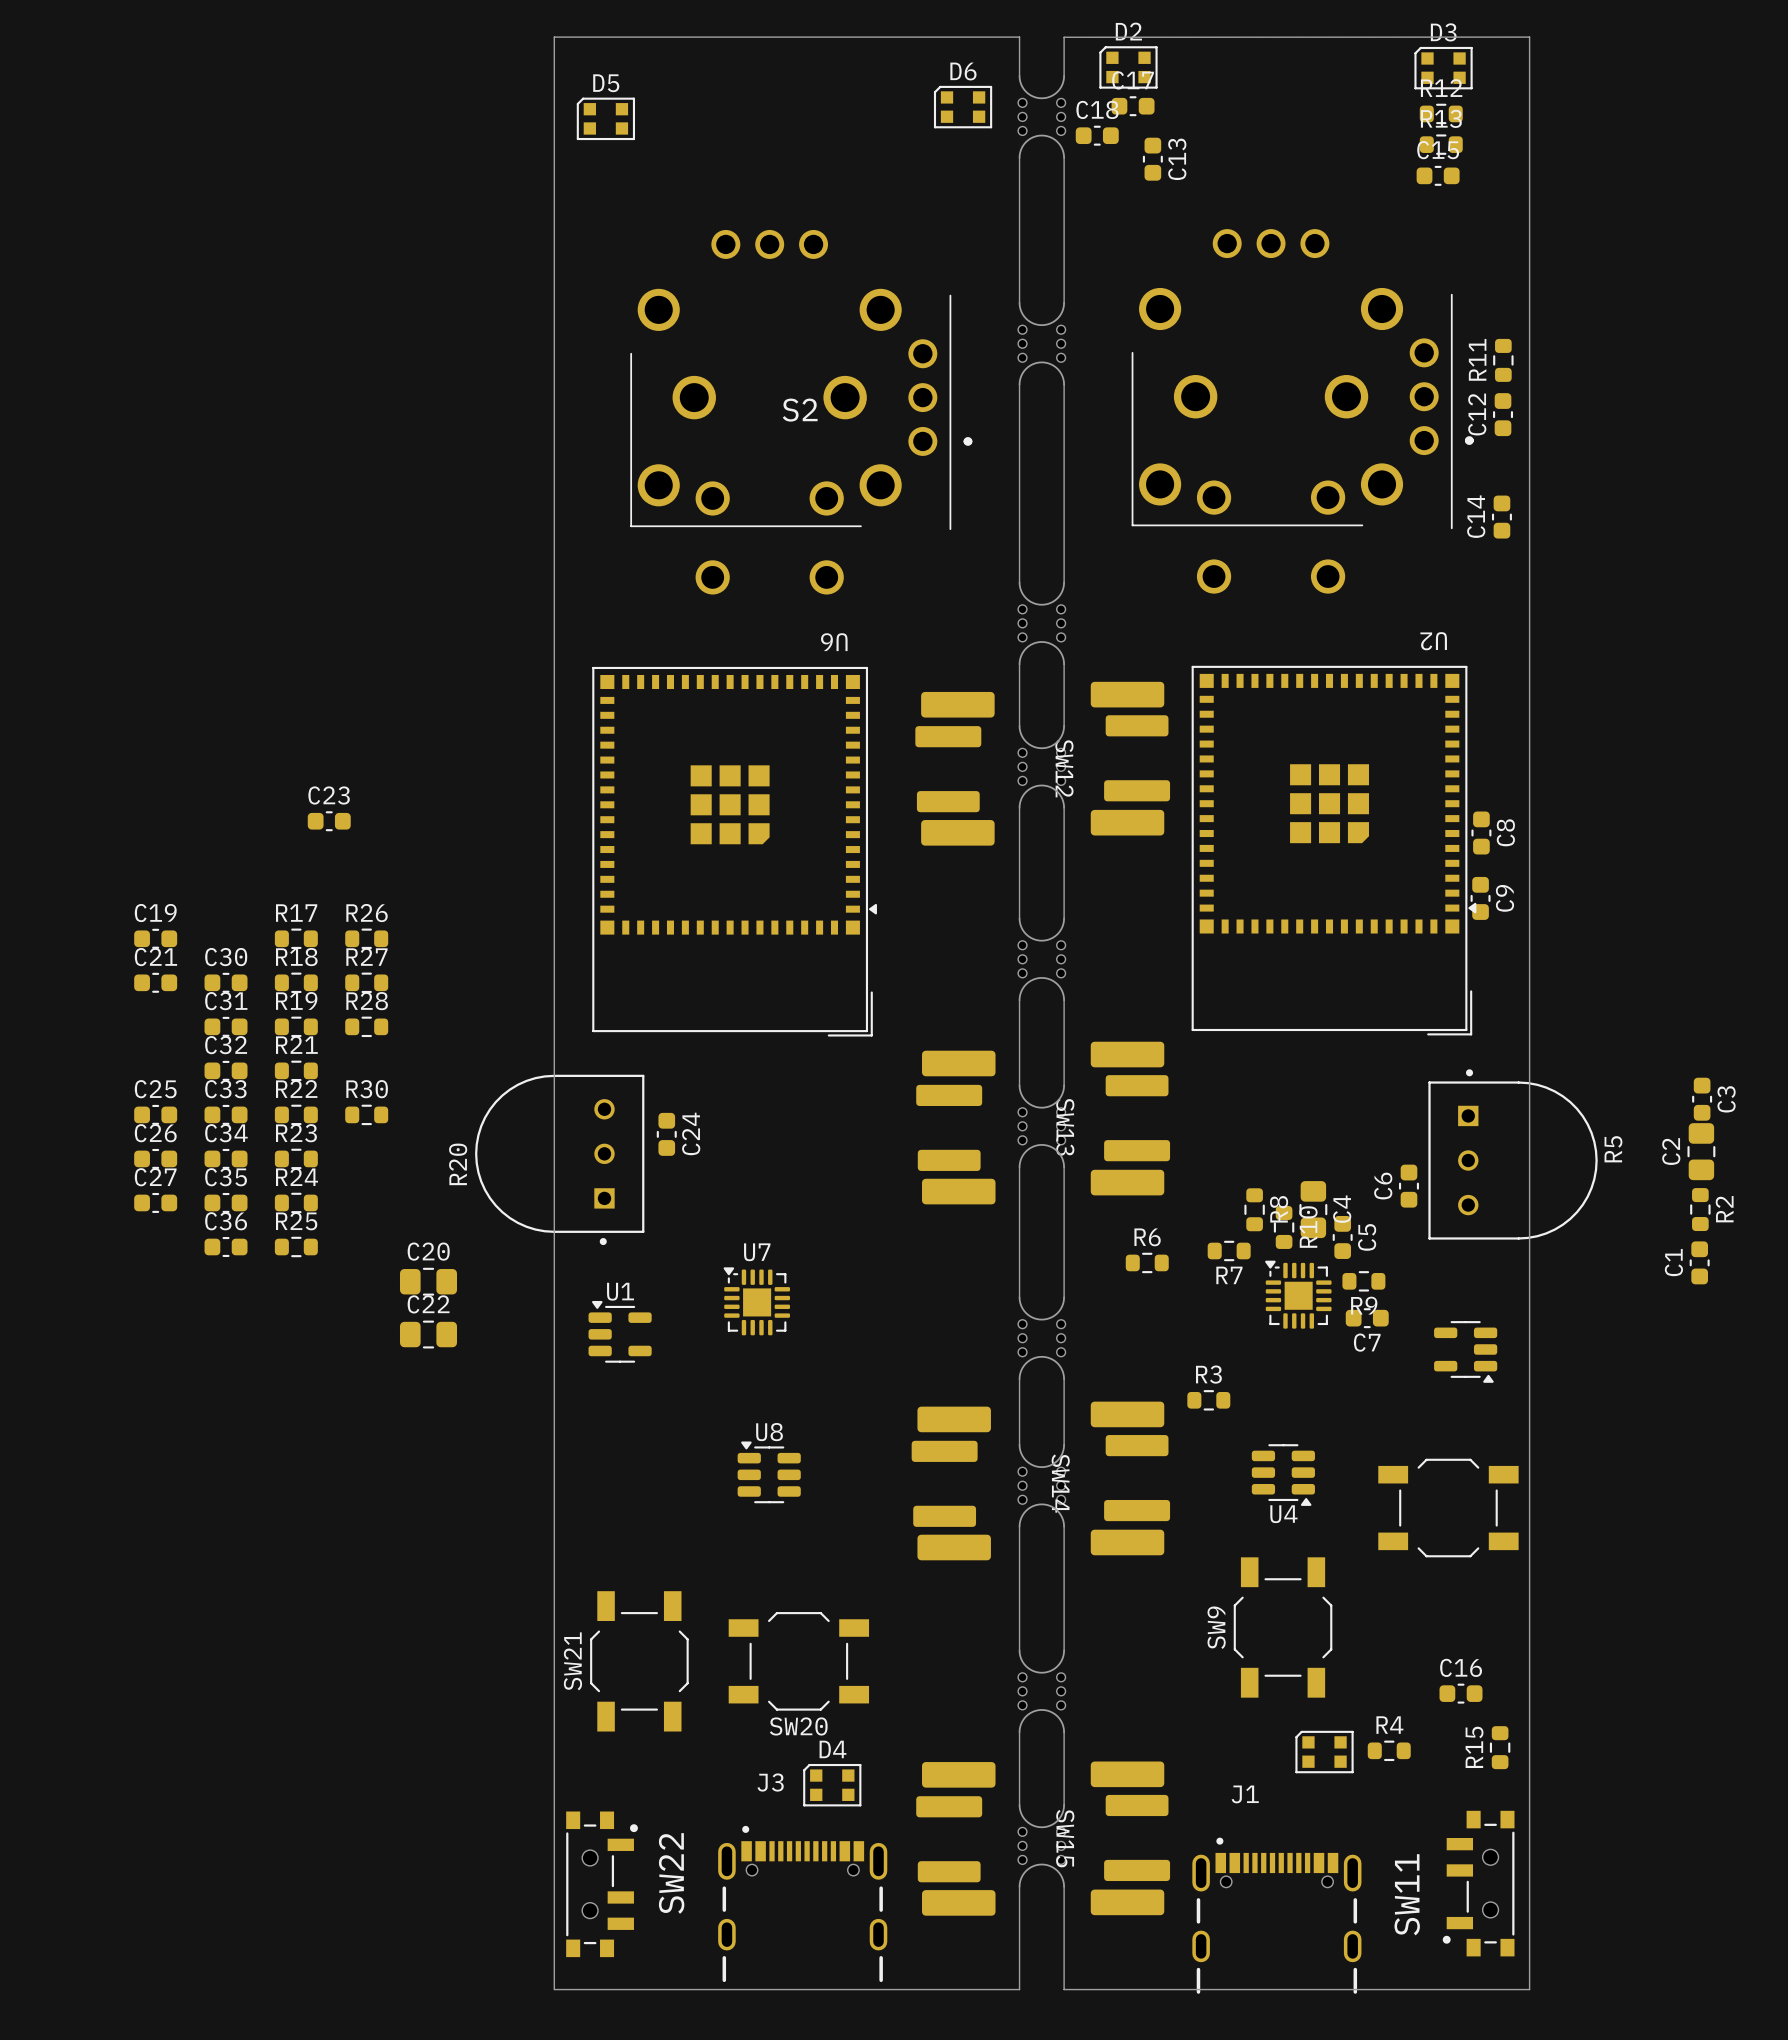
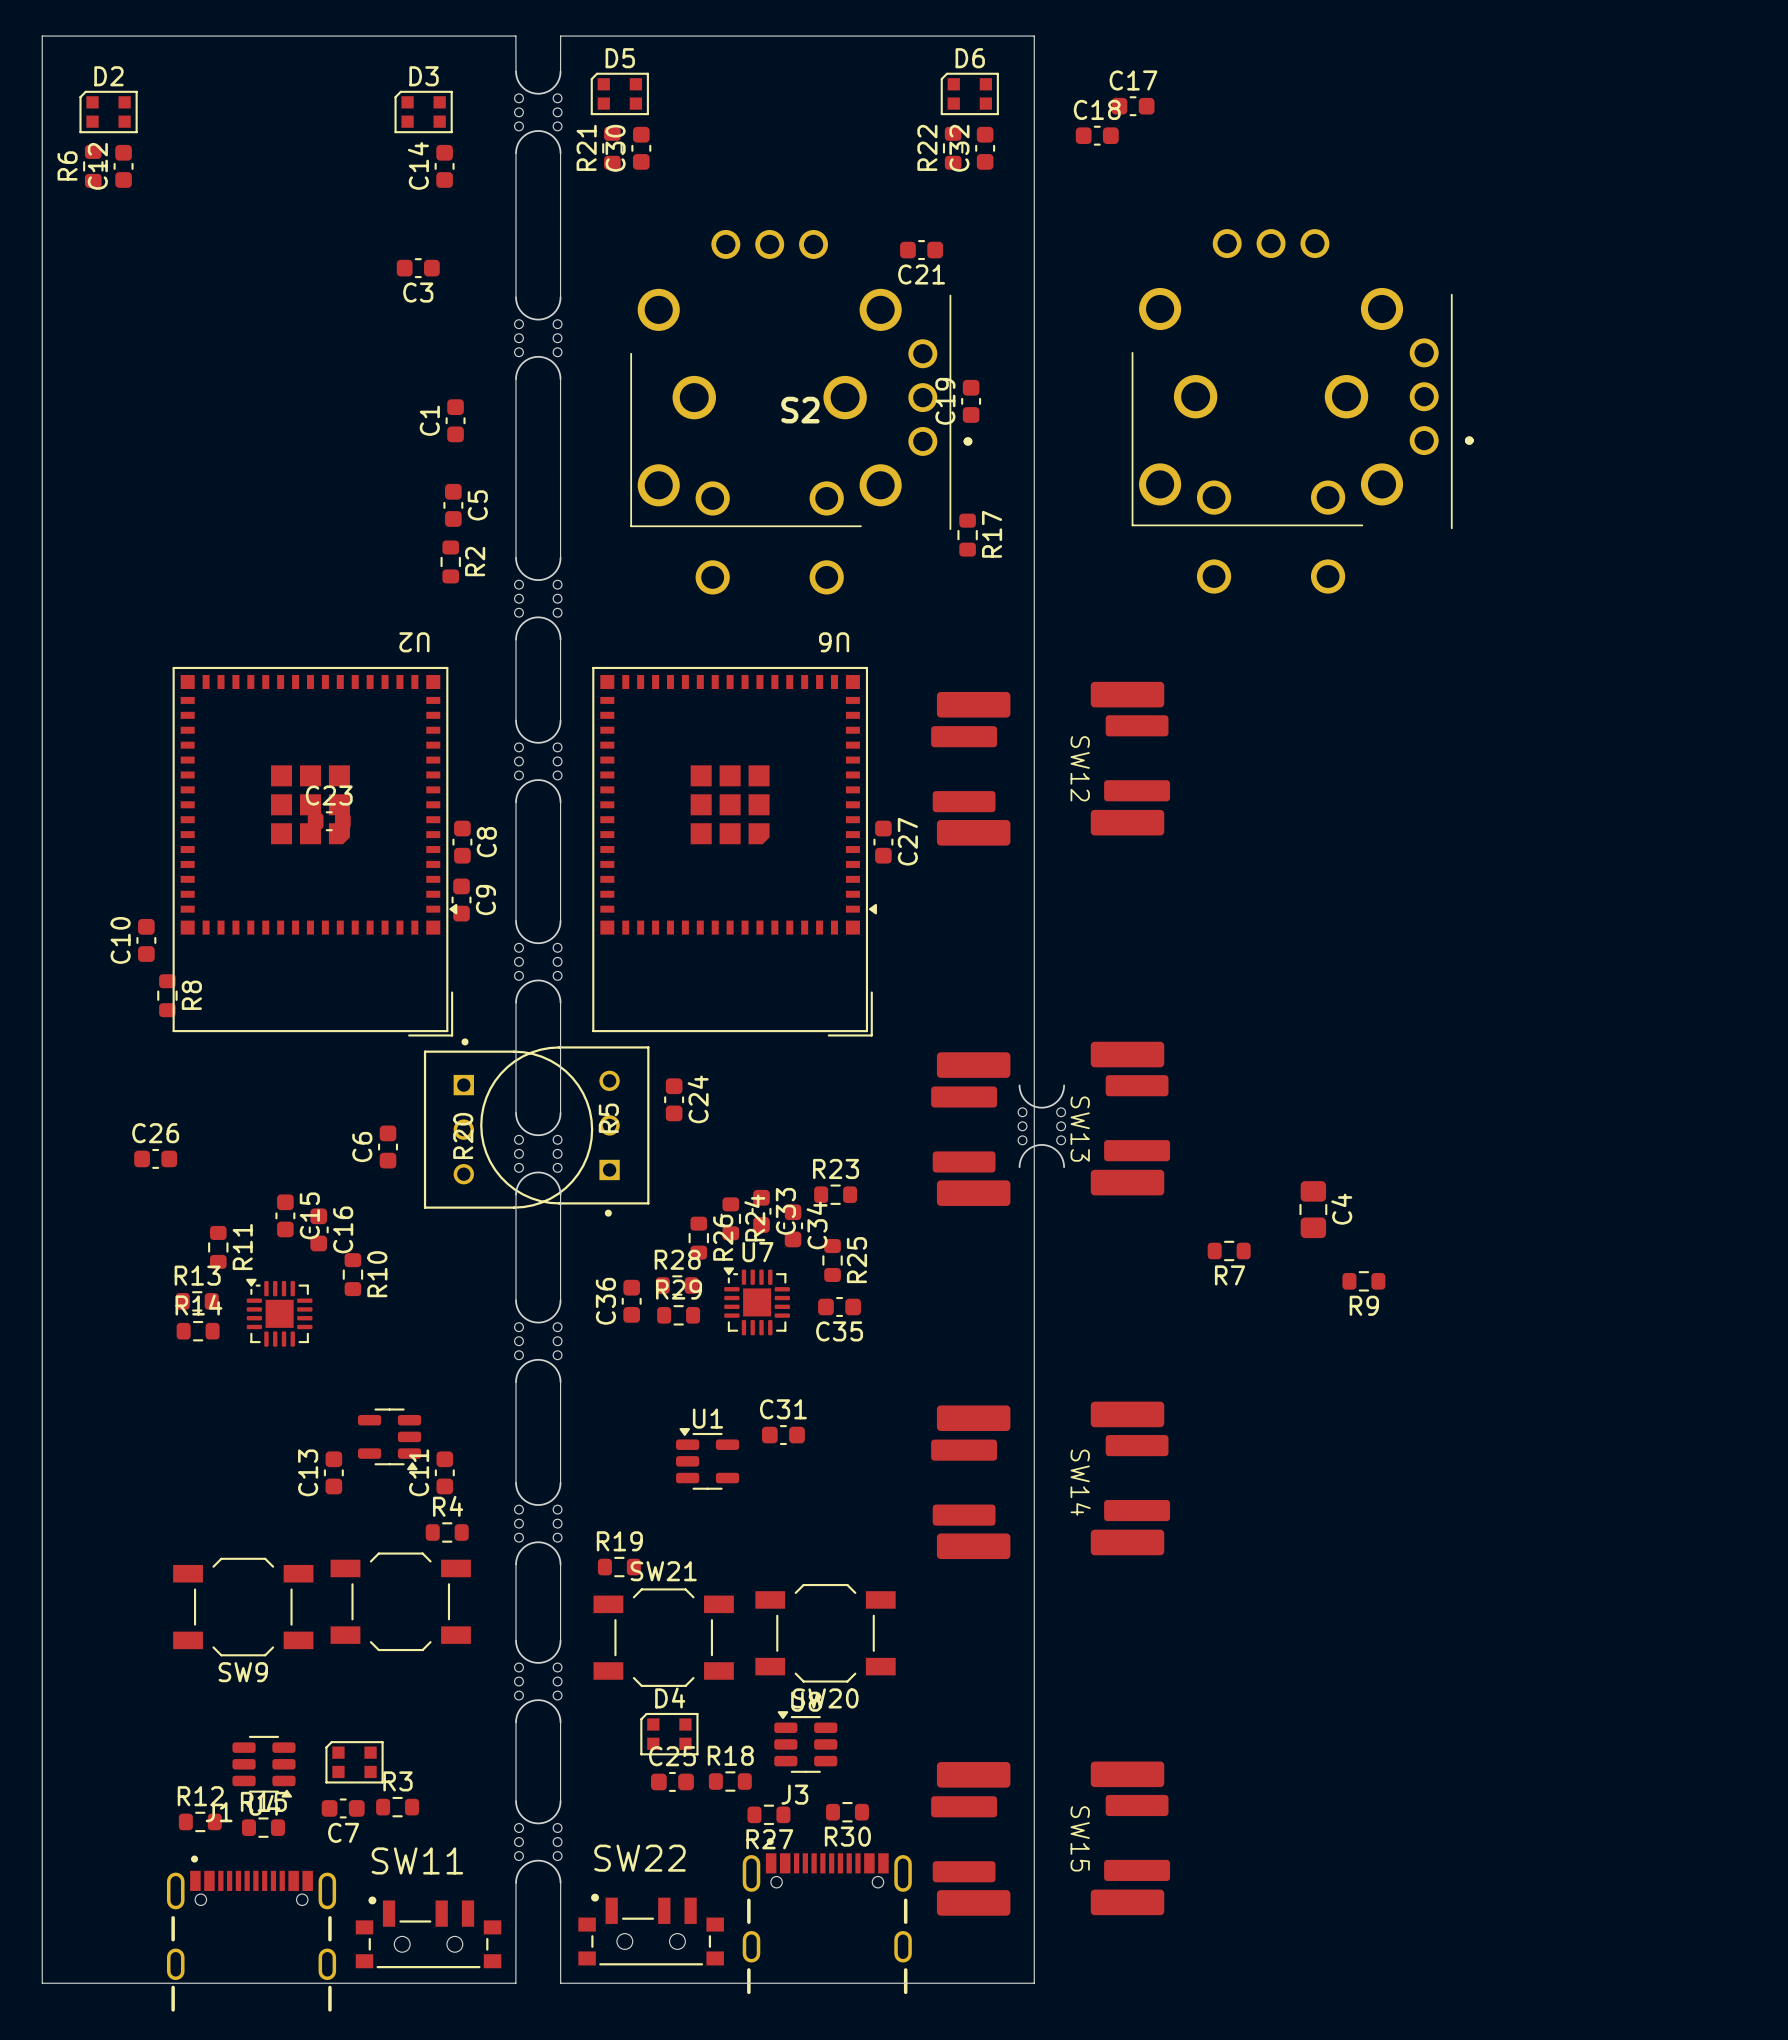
D2 position: (1128, 67) -> (108, 112)
D3 position: (1443, 68) -> (423, 112)
board edge: none -> (516, 71) (515, 36) (42, 36) (42, 1983) (515, 1983) (516, 1882)
board edge: none -> (560, 71) (560, 36) (1034, 36) (1034, 1983) (560, 1983) (560, 1882)
board edge: (1019, 76) (1019, 37) (554, 37) (554, 1989) -> none
board edge: (1064, 76) (1064, 37) (1529, 37) (1529, 1989) (1064, 1989) (1064, 1886) -> none
D6 position: (963, 107) -> (969, 93)
part: none -> (538, 112)
R12 position: (1441, 113) -> (200, 1821)
part: (1041, 116) -> none
D5 position: (605, 118) -> (619, 93)
R13 position: (1441, 144) -> (197, 1301)
board edge: none -> (516, 153) (515, 297)
board edge: none -> (560, 153) (560, 297)
board edge: (1019, 157) (1019, 302) -> none
board edge: (1064, 157) (1064, 302) -> none
C13 position: (1152, 159) -> (333, 1472)
C13 name position: C13 (1177, 159) -> C13 (308, 1472)
C15 rotation: 0° (1438, 175) -> 90° clockwise (285, 1215)
C15 position: (1438, 175) -> (285, 1215)
part: none -> (538, 338)
part: (1041, 343) -> none
R11 name position: R11 (1477, 359) -> R11 (242, 1247)
R11 position: (1503, 360) -> (218, 1247)
board edge: none -> (515, 378) (516, 557)
board edge: none -> (560, 379) (560, 557)
board edge: (1019, 384) (1019, 582) -> none
board edge: (1064, 384) (1064, 582) -> none
C12 position: (1503, 414) -> (123, 166)
C14 position: (1501, 517) -> (444, 166)
part: none -> (538, 598)
part: (1041, 623) -> none
board edge: none -> (516, 639) (516, 720)
board edge: none -> (560, 639) (560, 720)
board edge: (1019, 664) (1019, 725) -> none
board edge: (1064, 664) (1064, 725) -> none
part: none -> (538, 761)
part: (1041, 766) -> none
SW12 position: (954, 768) -> (970, 768)
board edge: none -> (516, 802) (516, 920)
board edge: none -> (560, 802) (560, 920)
board edge: (1019, 807) (1019, 918) -> none
board edge: (1064, 807) (1064, 918) -> none
C8 position: (1481, 832) -> (462, 842)
U2 position: (1334, 850) -> (314, 851)
C9 position: (1480, 898) -> (461, 900)
C19 name position: C19 (155, 913) -> C19 (945, 401)
C19 rotation: 0° (155, 938) -> 90° clockwise (971, 401)
C19 position: (155, 938) -> (971, 401)
R17 rotation: 0° (296, 938) -> 90° clockwise (967, 535)
R17 position: (296, 938) -> (967, 535)
R26 rotation: 0° (366, 938) -> 90° clockwise (698, 1238)
R26 position: (366, 938) -> (698, 1238)
C10: none -> (146, 940)
R27 name position: R27 (366, 956) -> R27 (769, 1839)
C21 name position: C21 (155, 957) -> C21 (921, 274)
C30 name position: C30 (226, 957) -> C30 (615, 148)
part: (1041, 959) -> none
part: none -> (538, 961)
C21 position: (155, 982) -> (921, 250)
C30 rotation: 0° (226, 982) -> 90° clockwise (641, 148)
C30 position: (226, 982) -> (641, 148)
R18 position: (296, 982) -> (730, 1781)
R27 position: (366, 982) -> (768, 1814)
board edge: (1019, 1000) (1019, 1085) -> none
board edge: (1064, 1000) (1064, 1085) -> none
board edge: none -> (516, 1002) (516, 1112)
board edge: none -> (560, 1002) (560, 1112)
C31 position: (226, 1026) -> (783, 1435)
R19 position: (296, 1026) -> (619, 1567)
R28 position: (366, 1026) -> (677, 1285)
R21 name position: R21 (296, 1044) -> R21 (586, 147)
C32 name position: C32 (226, 1045) -> C32 (959, 148)
C32 rotation: 0° (226, 1070) -> 90° clockwise (985, 148)
C32 position: (226, 1070) -> (985, 148)
R21 rotation: 0° (296, 1070) -> 90° clockwise (612, 148)
R21 position: (296, 1070) -> (612, 148)
R22 name position: R22 (296, 1089) -> R22 (927, 147)
R30 name position: R30 (367, 1089) -> R30 (847, 1836)
C3 rotation: 0° (1702, 1099) -> 90° clockwise (418, 268)
C3 position: (1702, 1099) -> (418, 268)
C25 position: (155, 1114) -> (672, 1781)
C33 rotation: 0° (226, 1114) -> 90° clockwise (761, 1211)
C33 position: (226, 1114) -> (761, 1211)
R22 rotation: 0° (296, 1114) -> 90° clockwise (953, 148)
R22 position: (296, 1114) -> (953, 148)
R30 position: (366, 1114) -> (847, 1812)
SW13 position: (955, 1127) -> (970, 1129)
C24 position: (666, 1134) -> (674, 1099)
C2: (1701, 1151) -> none
part: none -> (538, 1153)
R5 position: (1513, 1154) -> (508, 1123)
C34 rotation: 0° (226, 1158) -> 90° clockwise (793, 1225)
C34 position: (226, 1158) -> (793, 1225)
R23 position: (296, 1158) -> (835, 1194)
R20 position: (559, 1159) -> (564, 1131)
board edge: (1019, 1167) (1019, 1297) -> none
board edge: (1064, 1167) (1064, 1297) -> none
C35 name position: C35 (226, 1177) -> C35 (839, 1331)
C6 position: (1408, 1186) -> (388, 1147)
board edge: none -> (516, 1194) (516, 1300)
board edge: none -> (560, 1194) (560, 1300)
C27 rotation: 0° (155, 1202) -> 90° clockwise (883, 842)
C27 position: (155, 1202) -> (883, 842)
C35 position: (226, 1202) -> (839, 1306)
R24 rotation: 0° (296, 1202) -> 90° clockwise (730, 1218)
R24 position: (296, 1202) -> (730, 1218)
R8 position: (1254, 1209) -> (167, 995)
R2 position: (1700, 1209) -> (450, 561)
C36 name position: C36 (226, 1221) -> C36 (605, 1301)
R10 position: (1284, 1227) -> (352, 1274)
R6 name position: R6 (1147, 1237) -> R6 (67, 165)
C5 position: (1342, 1237) -> (453, 505)
C36 rotation: 0° (226, 1246) -> 90° clockwise (631, 1301)
C36 position: (226, 1246) -> (631, 1301)
R25 rotation: 0° (296, 1246) -> 90° clockwise (832, 1260)
R25 position: (296, 1246) -> (832, 1260)
R6 rotation: 0° (1147, 1262) -> 90° clockwise (93, 166)
R6 position: (1147, 1262) -> (93, 166)
C1 position: (1699, 1262) -> (455, 420)
C20: (428, 1281) -> none
part: (1298, 1294) -> none
part: none -> (279, 1312)
R29: none -> (678, 1315)
C7 position: (1367, 1318) -> (343, 1808)
R14: none -> (198, 1331)
U1 position: (620, 1331) -> (707, 1458)
C22: (428, 1334) -> none
part: (1041, 1338) -> none
part: none -> (538, 1341)
part: (1465, 1351) -> none
board edge: (1019, 1379) (1019, 1444) -> none
board edge: (1064, 1379) (1064, 1444) -> none
board edge: none -> (516, 1382) (516, 1482)
board edge: none -> (560, 1382) (560, 1482)
R3 position: (1208, 1400) -> (397, 1807)
part: none -> (389, 1439)
C11: none -> (444, 1472)
U8 position: (769, 1472) -> (805, 1741)
U4 position: (1283, 1475) -> (263, 1766)
SW14 position: (951, 1483) -> (970, 1482)
part: (1041, 1485) -> none
part: (1448, 1508) -> none
part: none -> (538, 1523)
board edge: (1019, 1526) (1019, 1650) -> none
board edge: (1064, 1526) (1064, 1650) -> none
board edge: none -> (516, 1564) (516, 1640)
board edge: none -> (560, 1564) (560, 1640)
part: none -> (400, 1601)
SW9 name position: SW9 (1216, 1627) -> SW9 (243, 1672)
SW9 rotation: 0° (1283, 1627) -> 90° clockwise (243, 1607)
SW9 position: (1283, 1627) -> (243, 1607)
SW21 rotation: 0° (639, 1661) -> 90° clockwise (663, 1637)
SW20 position: (798, 1661) -> (825, 1633)
part: none -> (538, 1681)
part: (1041, 1691) -> none
C16 rotation: 0° (1461, 1693) -> 90° clockwise (318, 1229)
C16 position: (1461, 1693) -> (318, 1229)
board edge: none -> (516, 1722) (516, 1801)
board edge: none -> (560, 1722) (560, 1801)
board edge: (1019, 1732) (1019, 1805) -> none
board edge: (1064, 1732) (1064, 1805) -> none
R15 rotation: 0° (1500, 1747) -> 90° clockwise (263, 1827)
R15 position: (1500, 1747) -> (263, 1827)
R4 position: (1389, 1750) -> (447, 1532)
part: (1324, 1752) -> none
part: none -> (354, 1762)
D4 position: (832, 1785) -> (669, 1734)
SW15 position: (955, 1838) -> (970, 1838)
part: none -> (538, 1842)
part: (1041, 1845) -> none
SW11 rotation: 0° (1478, 1883) -> 90° clockwise (428, 1932)
SW11 position: (1478, 1883) -> (428, 1932)
SW22 rotation: 0° (602, 1884) -> 90° counterclockwise (651, 1929)
board edge: (1019, 1886) (1019, 1989) (554, 1989) -> none
J3 position: (802, 1903) -> (827, 1916)
J1 position: (1276, 1915) -> (251, 1933)

